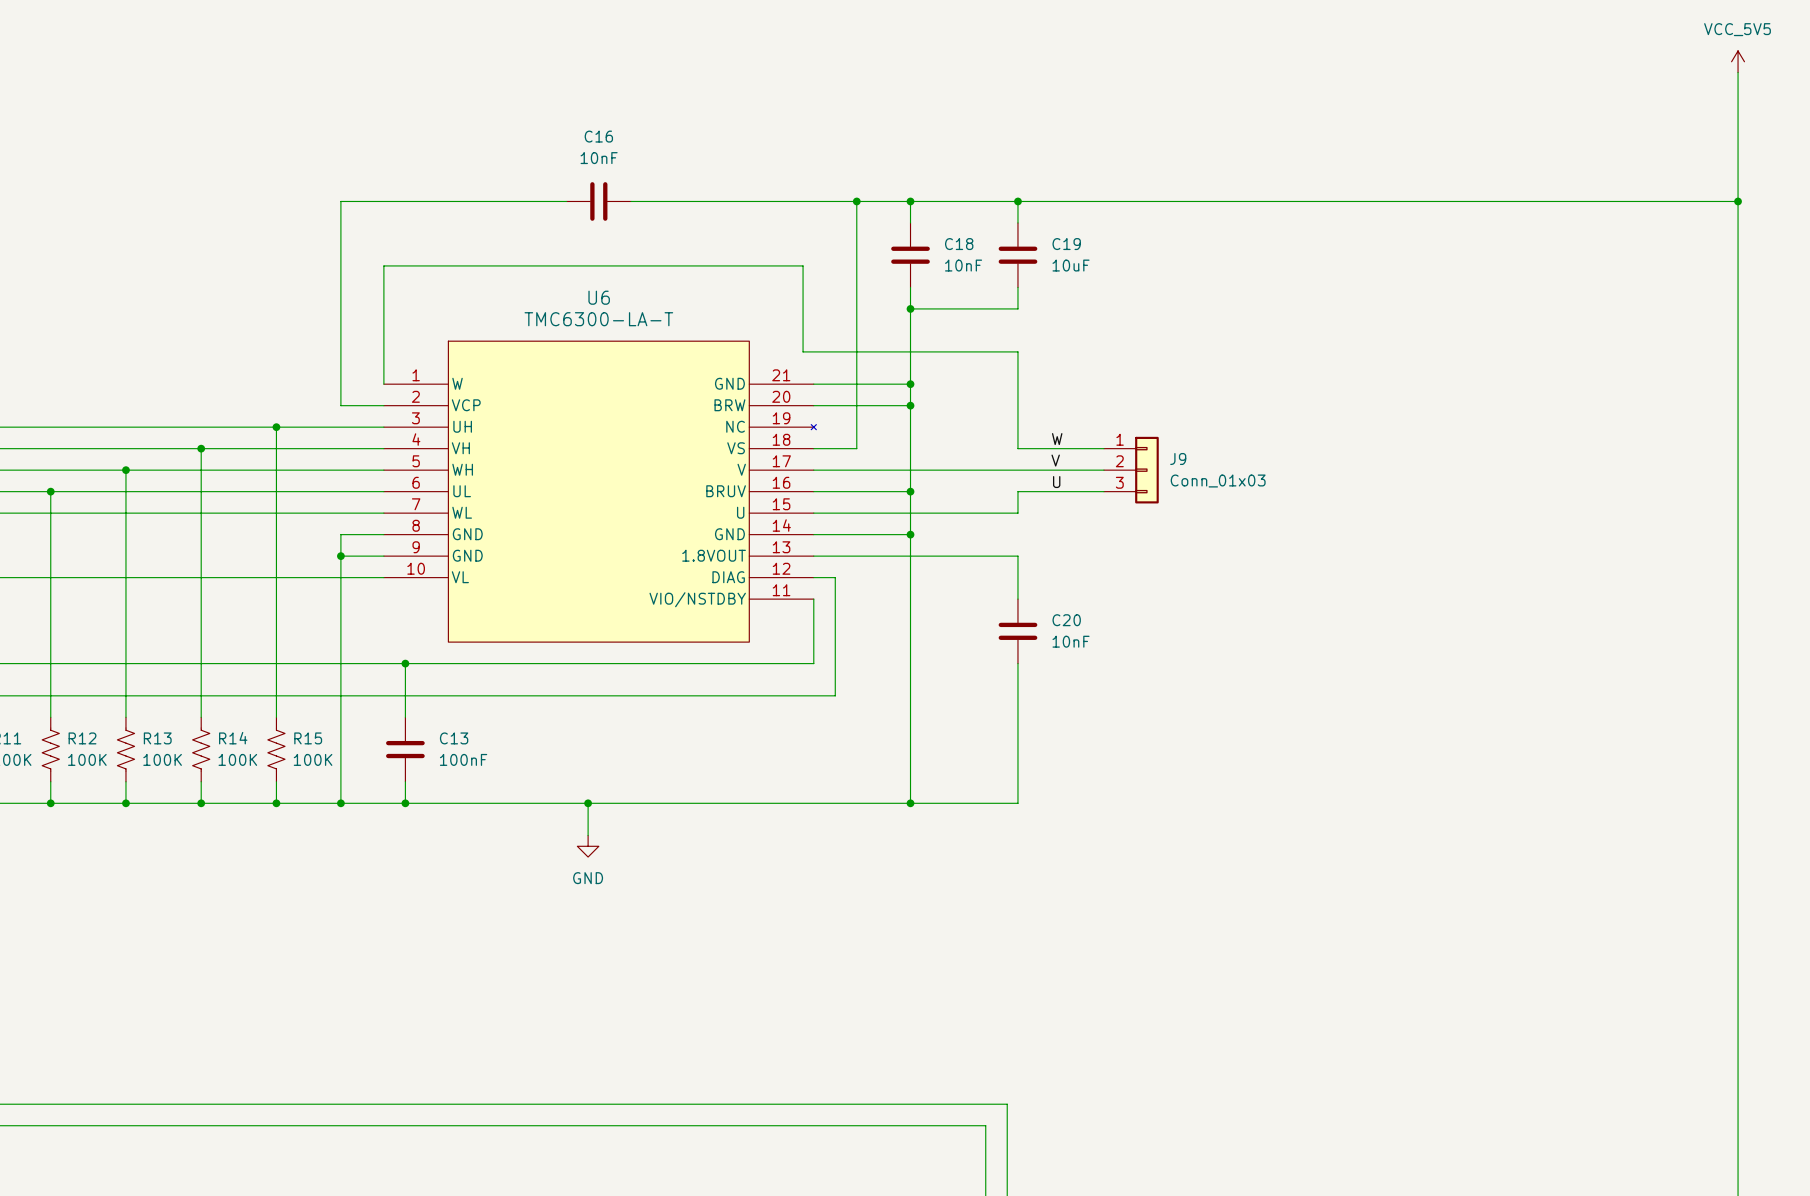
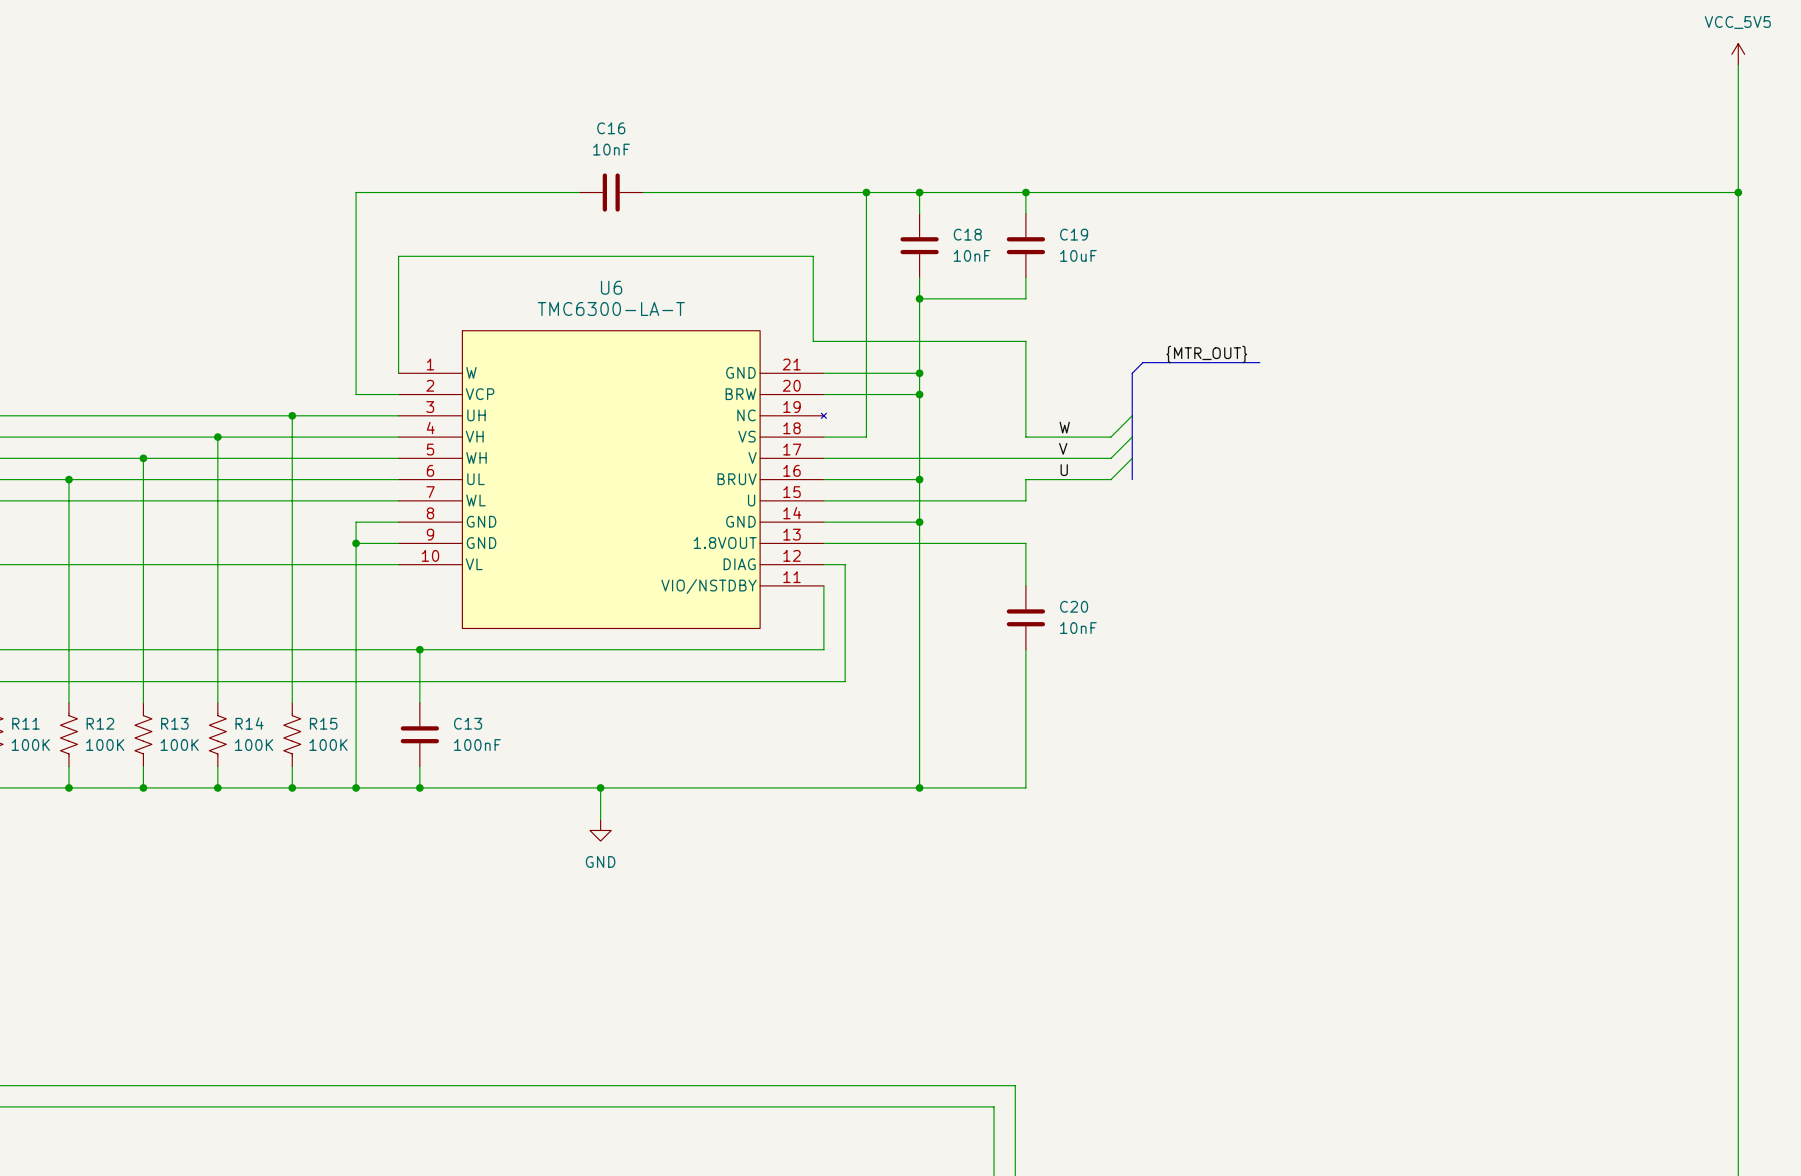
label: none -> {MTR_OUT} (1206, 354)
bus: none -> (1259, 362) (1142, 362) (1132, 373) (1132, 479)
wire: none -> (1132, 415) (1110, 437)
wire: none -> (1132, 437) (1110, 458)
wire: none -> (1132, 458) (1110, 479)
J9: Conn_01x03 (1131, 470) -> none

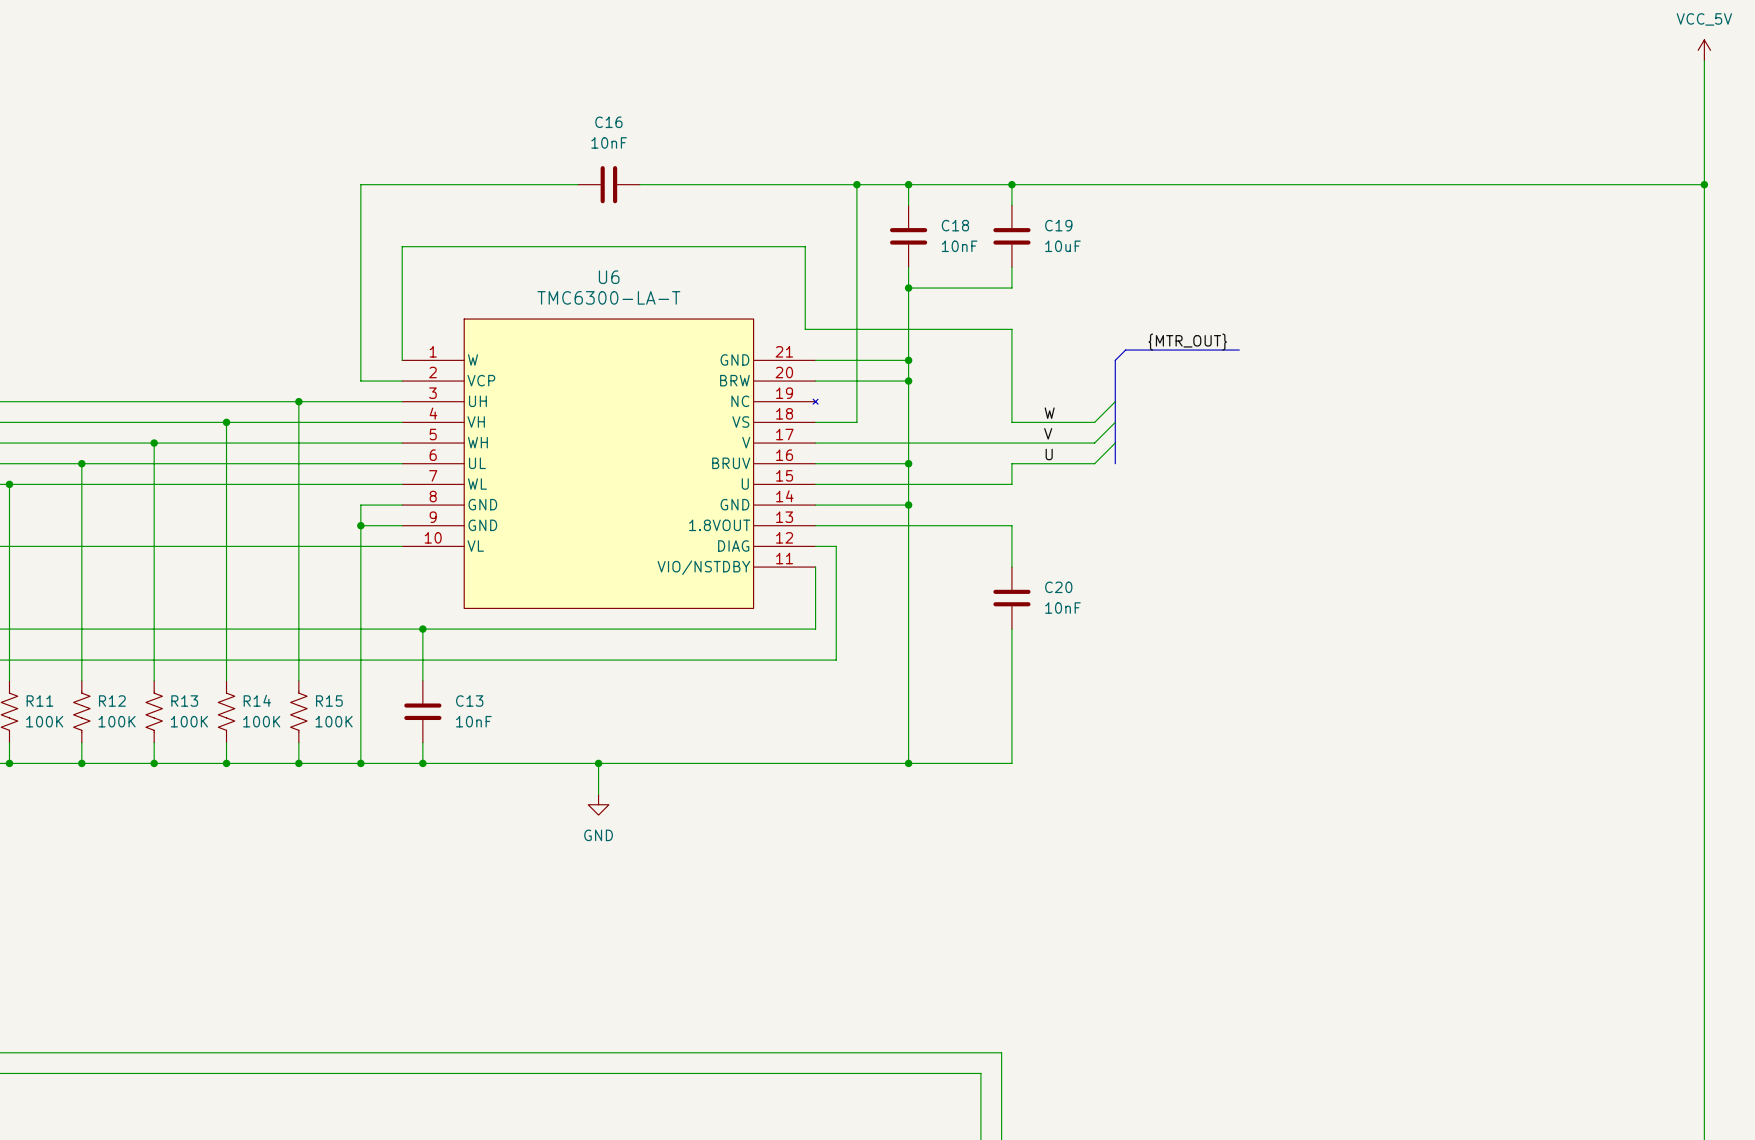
power symbol: VCC_5V5 (1738, 54) -> VCC_5V (1704, 50)
C13 value: 100nF (477, 745) -> 10nF (473, 721)

